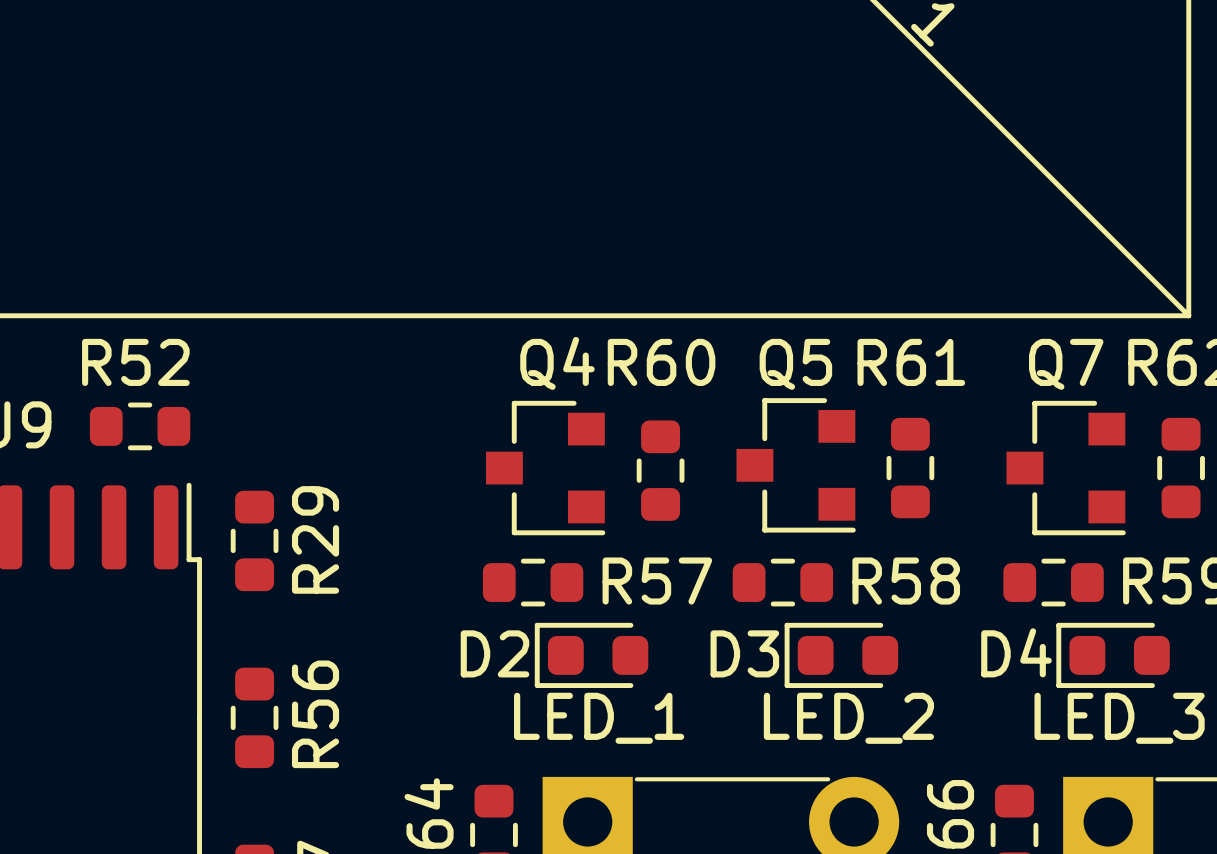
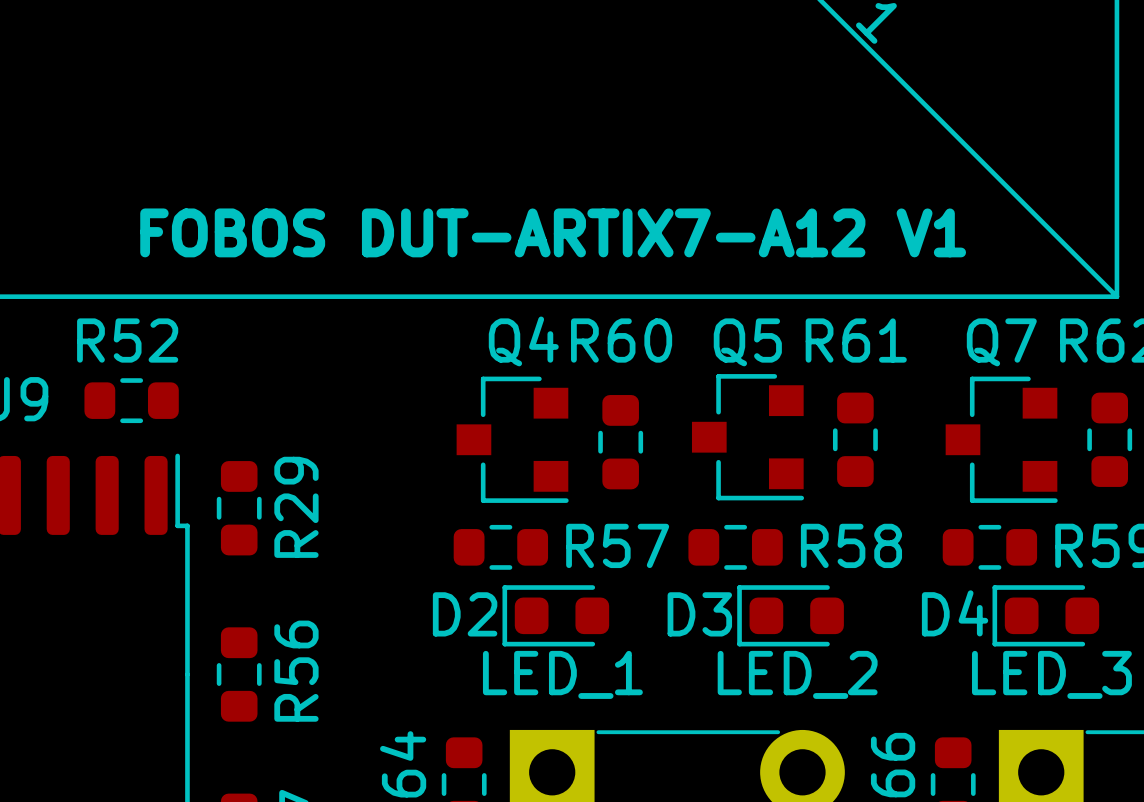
text: none -> FOBOS DUT-ARTIX7-A12 V1 (553, 232)

